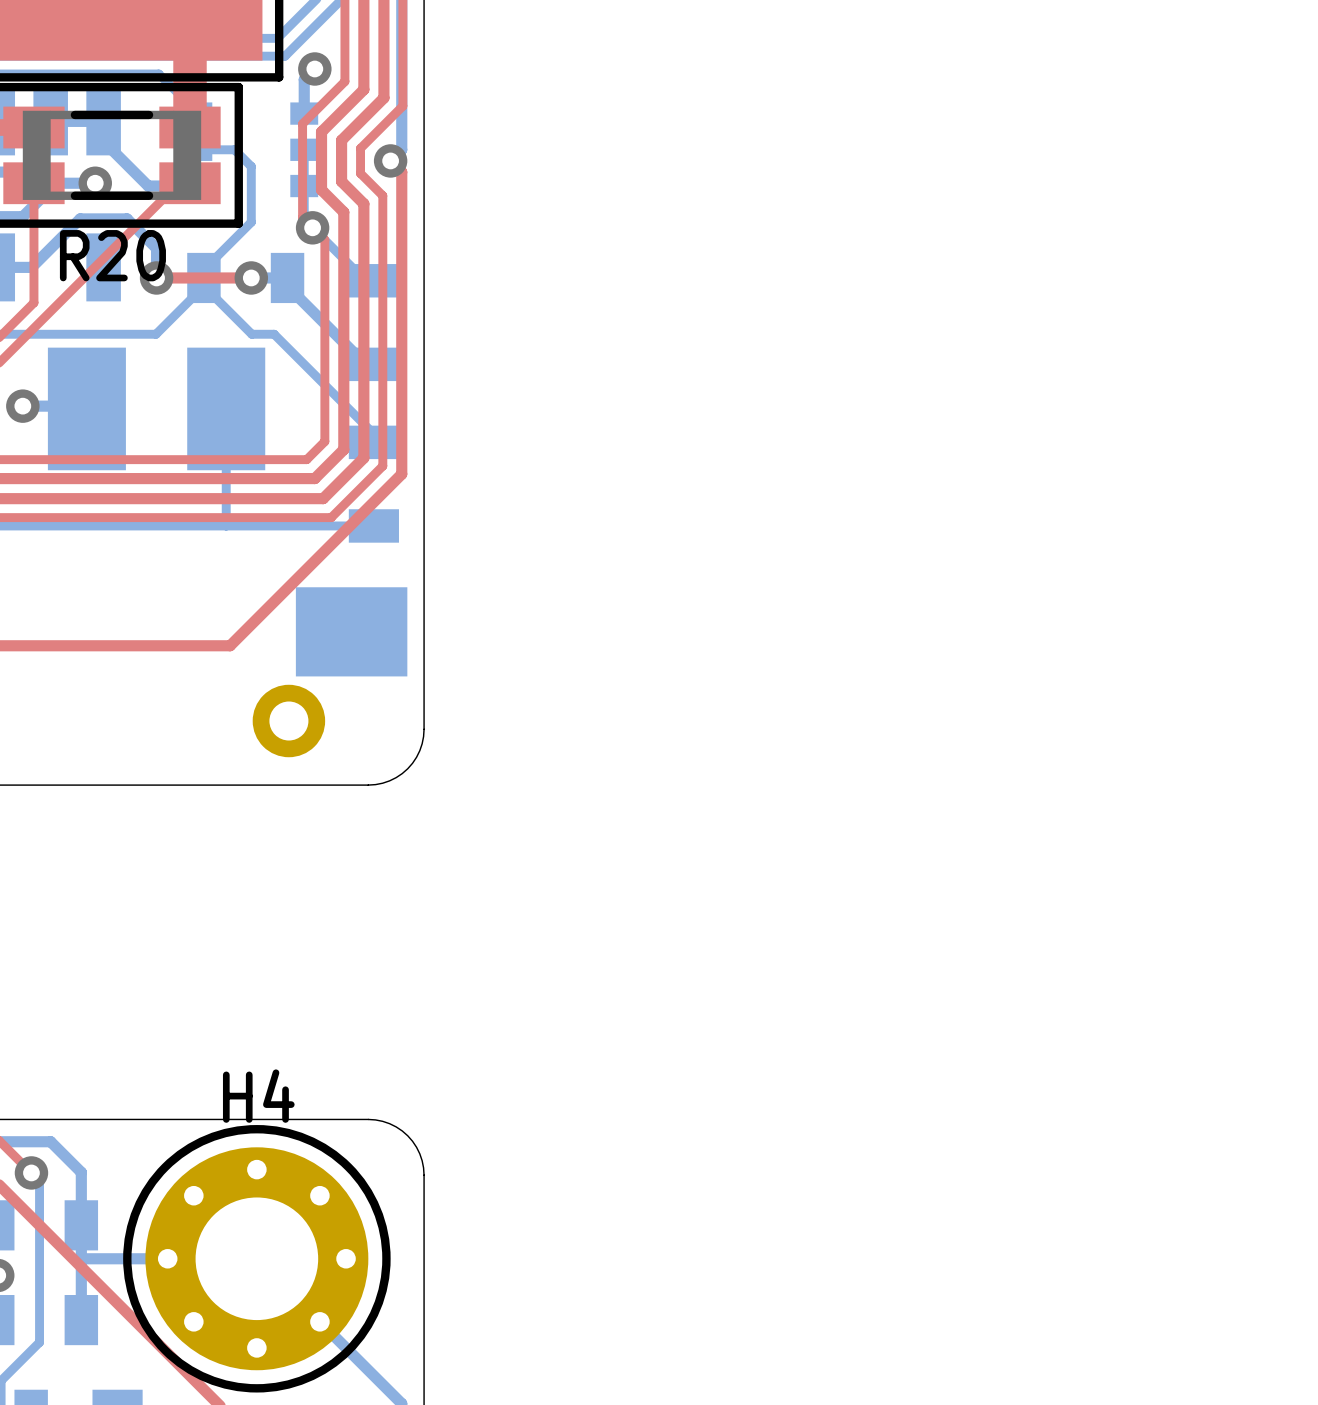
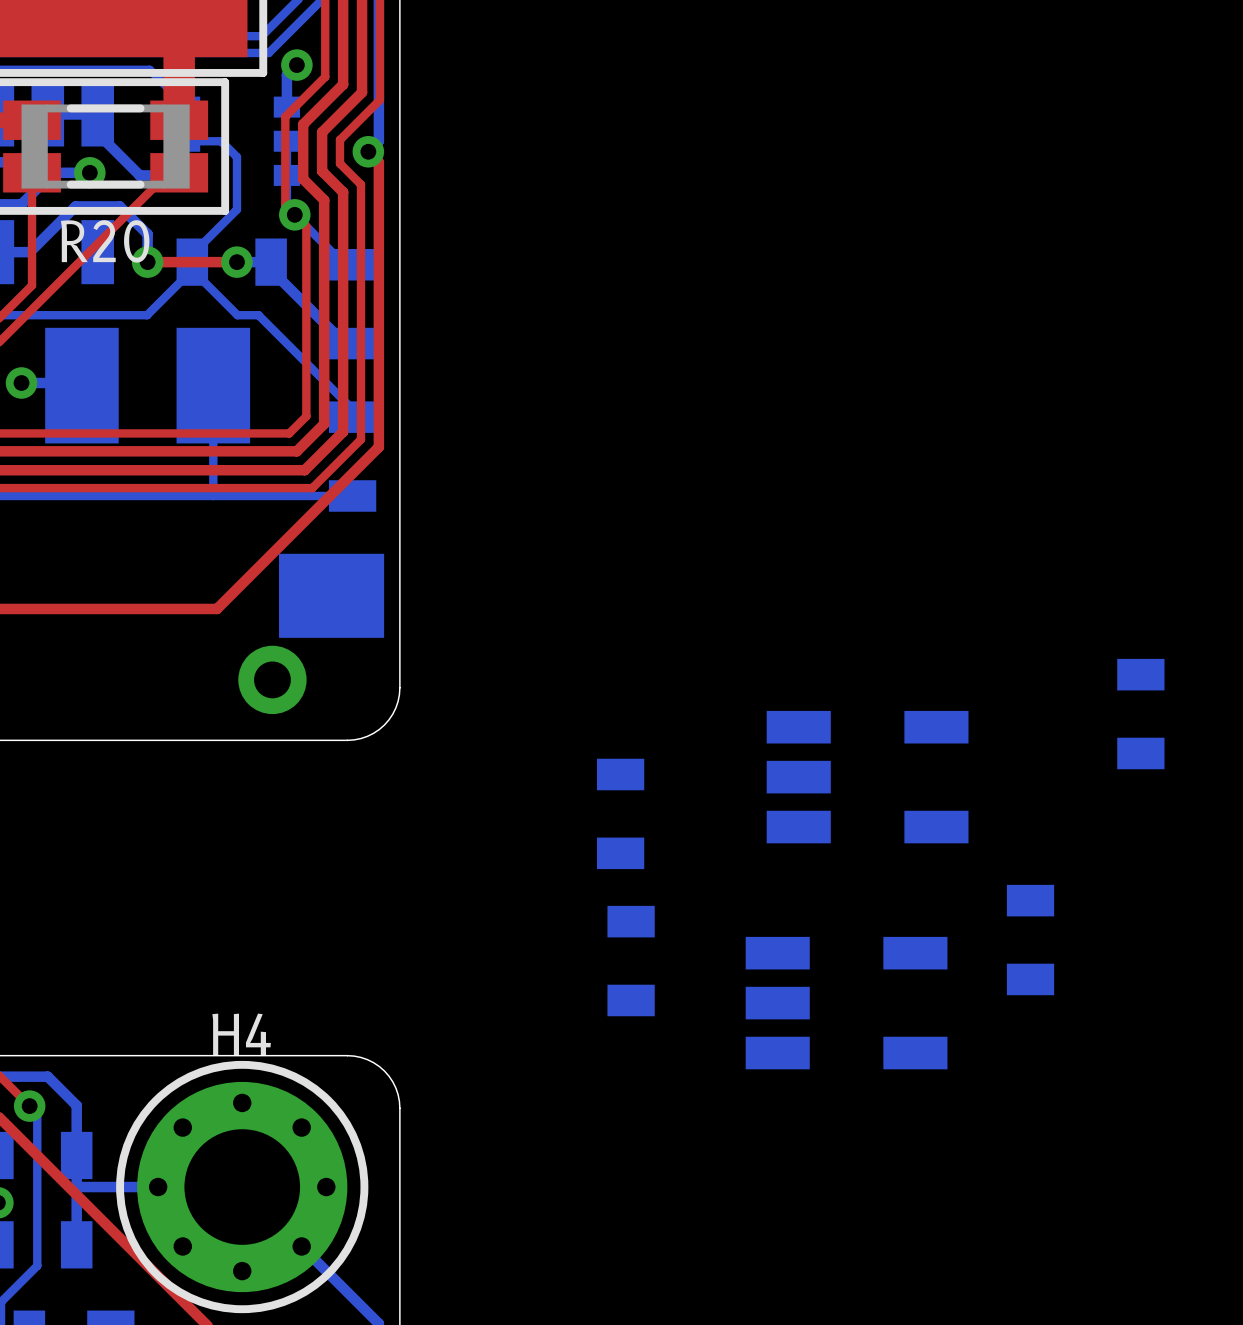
part: none -> (1140, 714)
part: none -> (867, 777)
part: none -> (620, 813)
part: none -> (1030, 940)
part: none -> (631, 961)
part: none -> (846, 1003)

